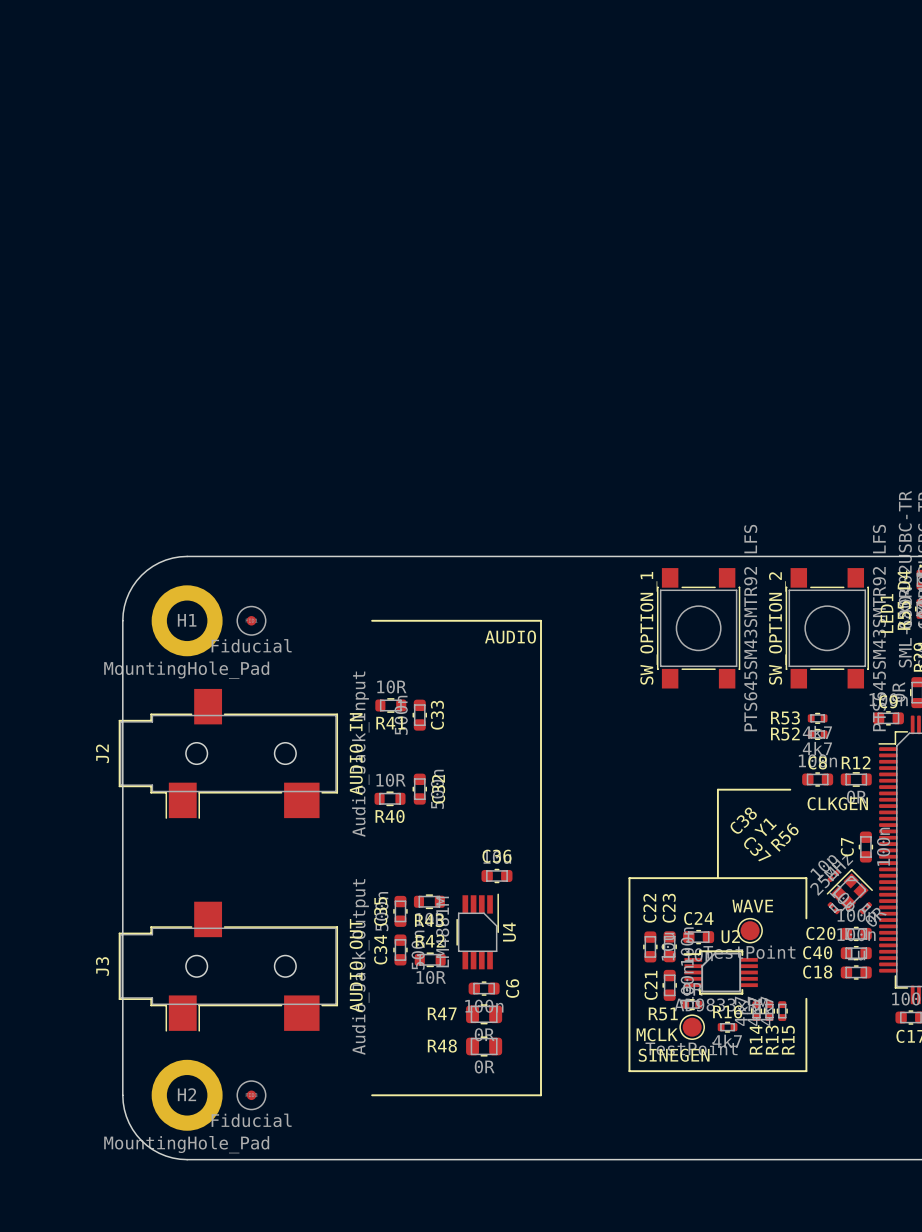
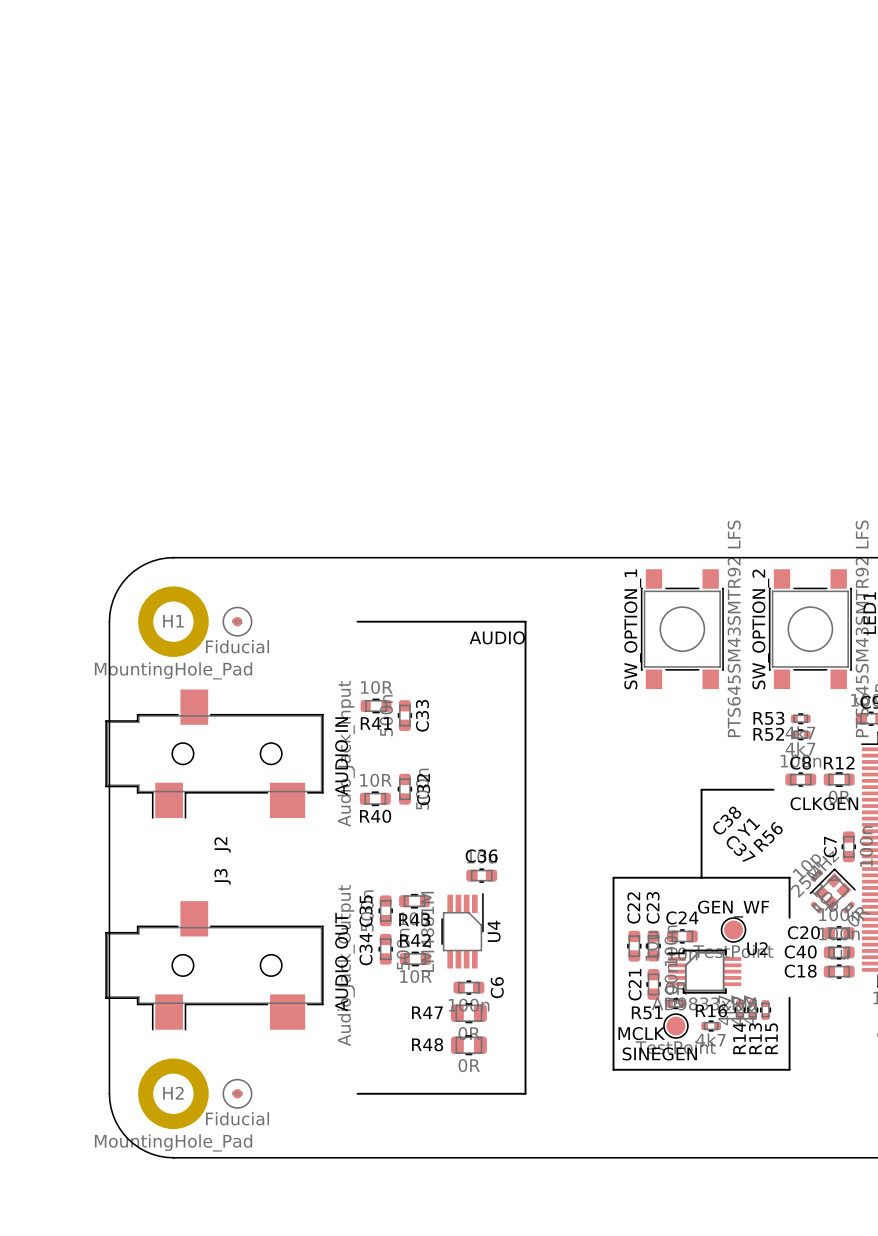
J2 name position: J2 (102, 753) -> J2 (222, 844)
WAVE name: WAVE (752, 906) -> GEN_WF (733, 909)
U2 name position: U2 (730, 936) -> U2 (757, 948)
J3 name position: J3 (102, 966) -> J3 (222, 876)

